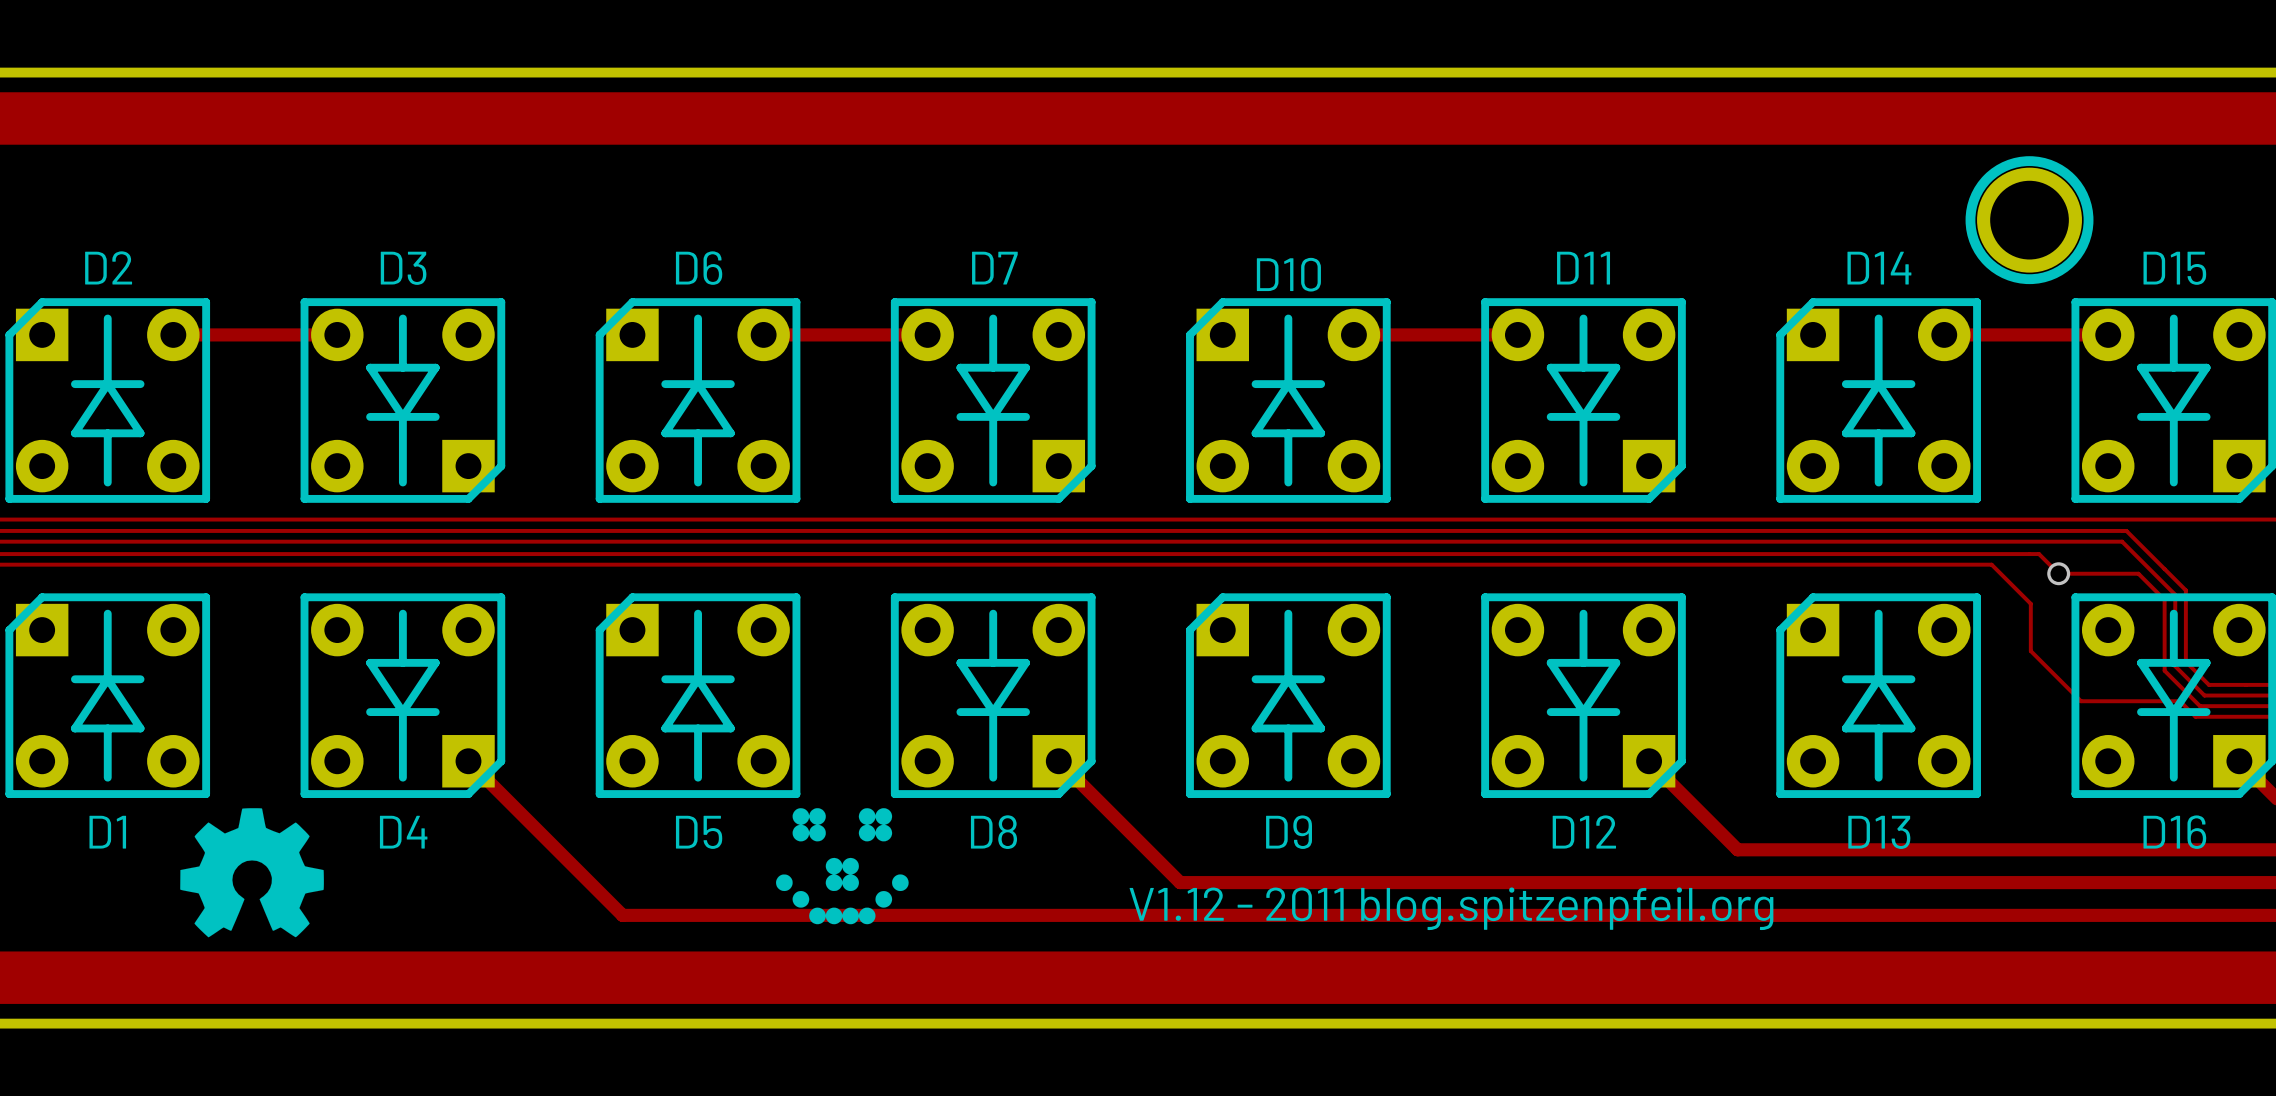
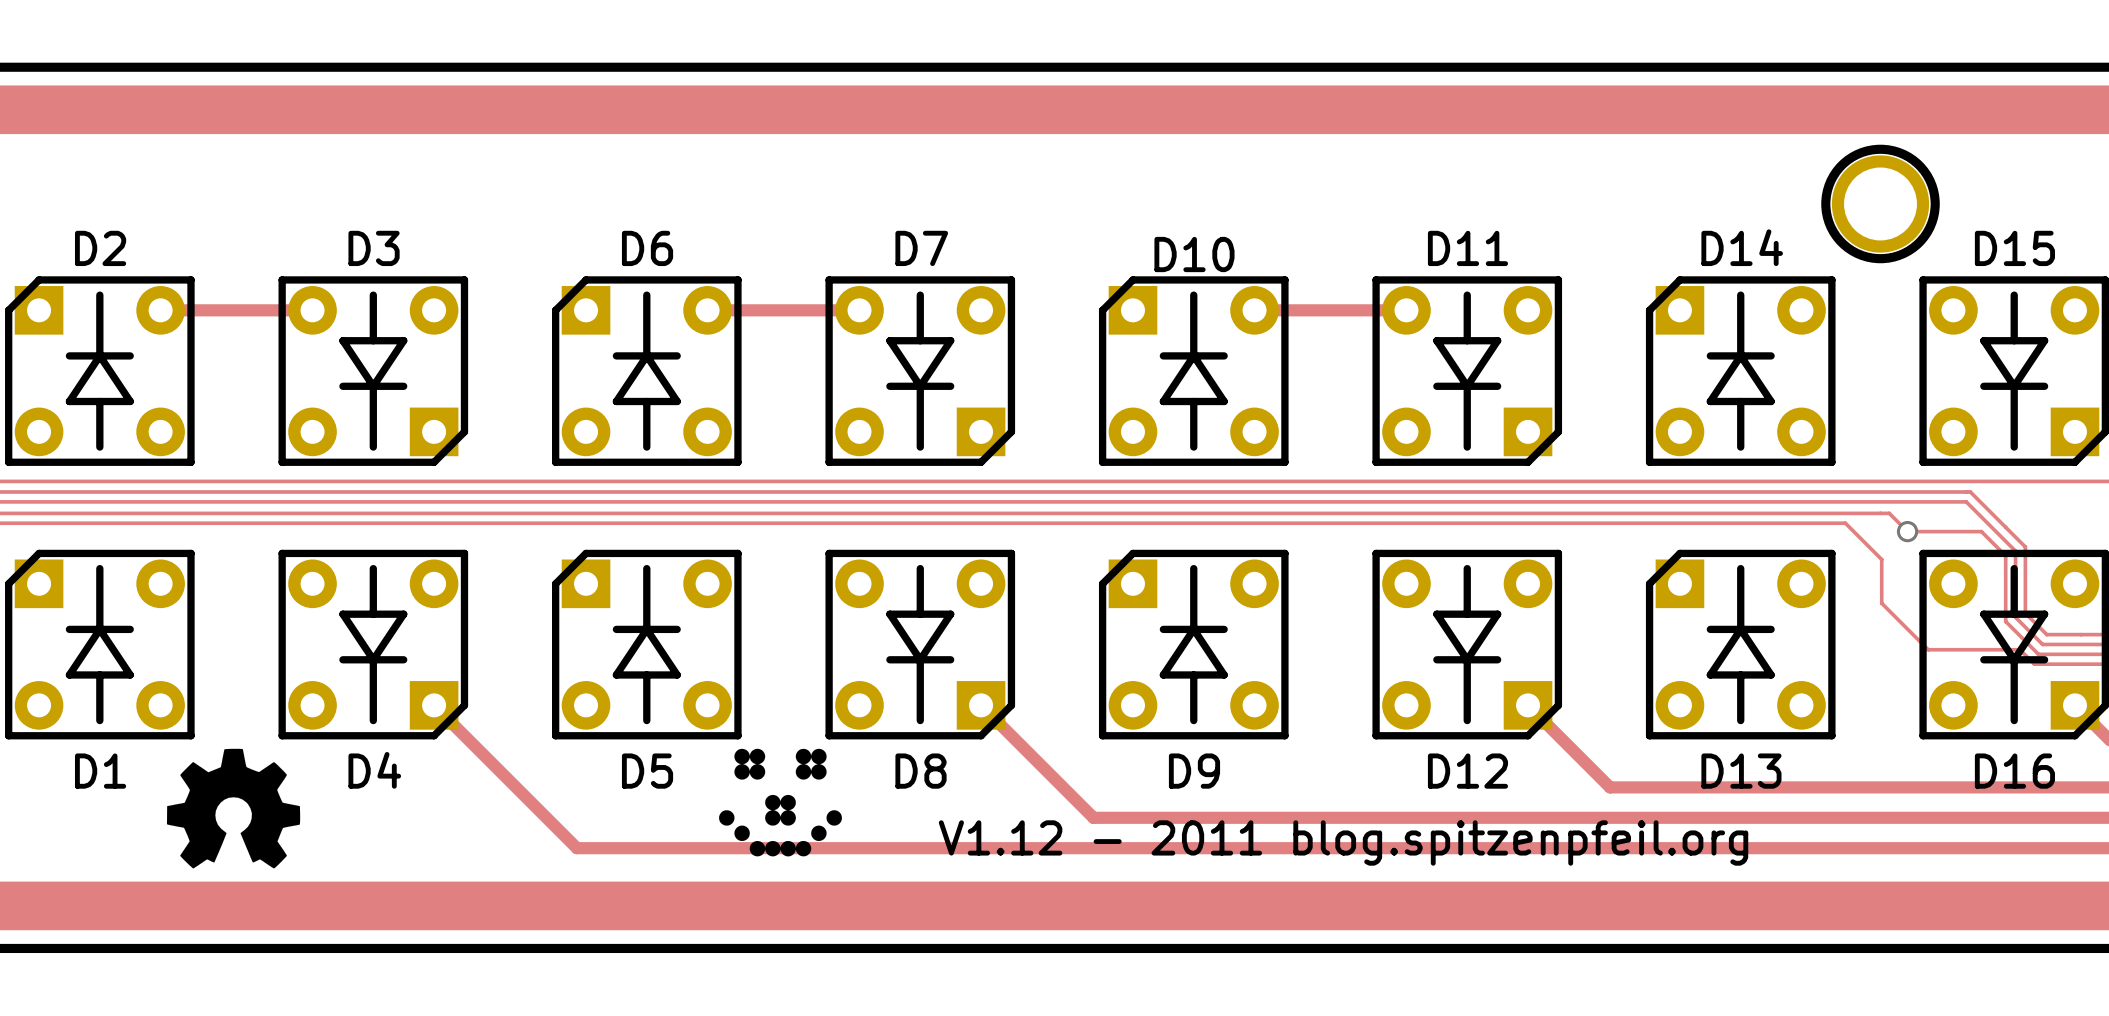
track: (1944, 334) (2108, 334) -> none

